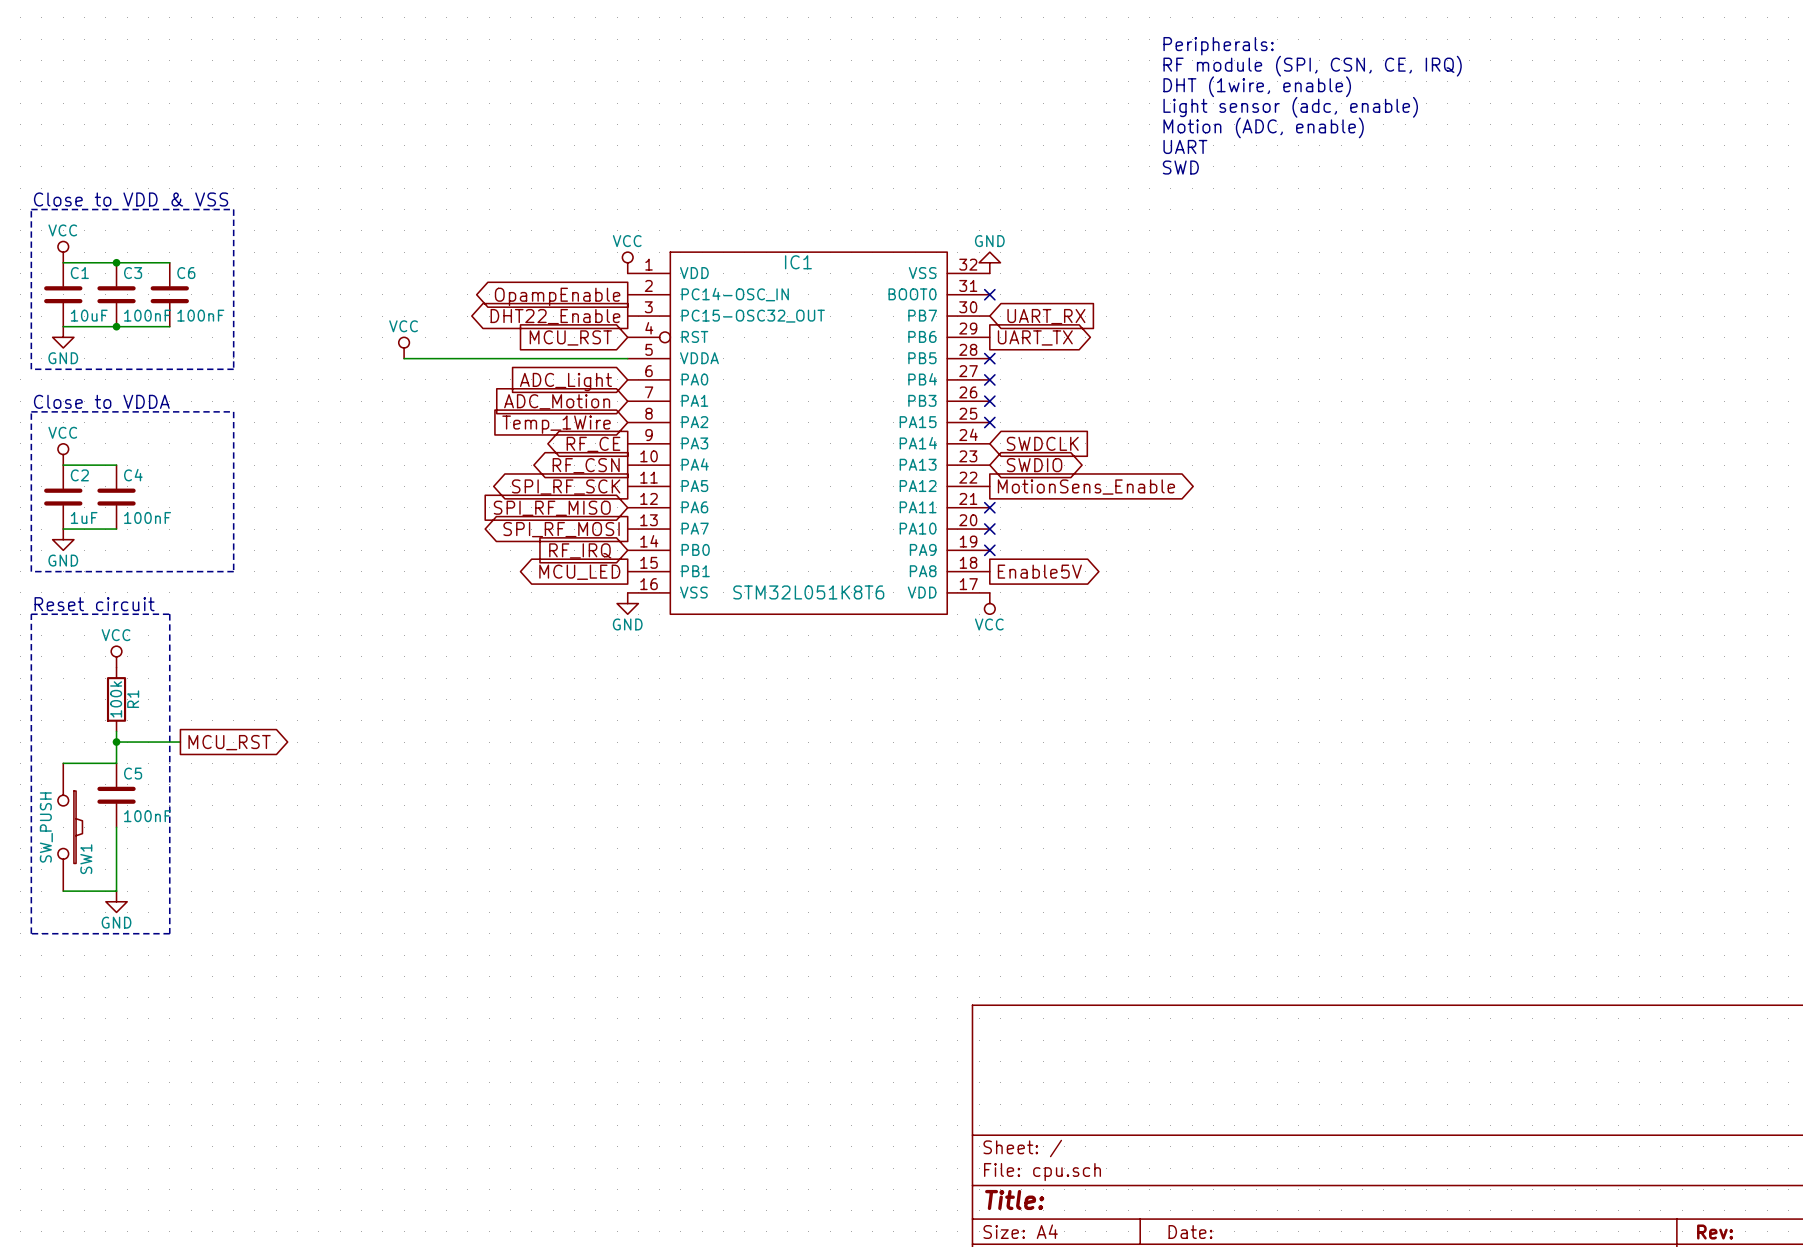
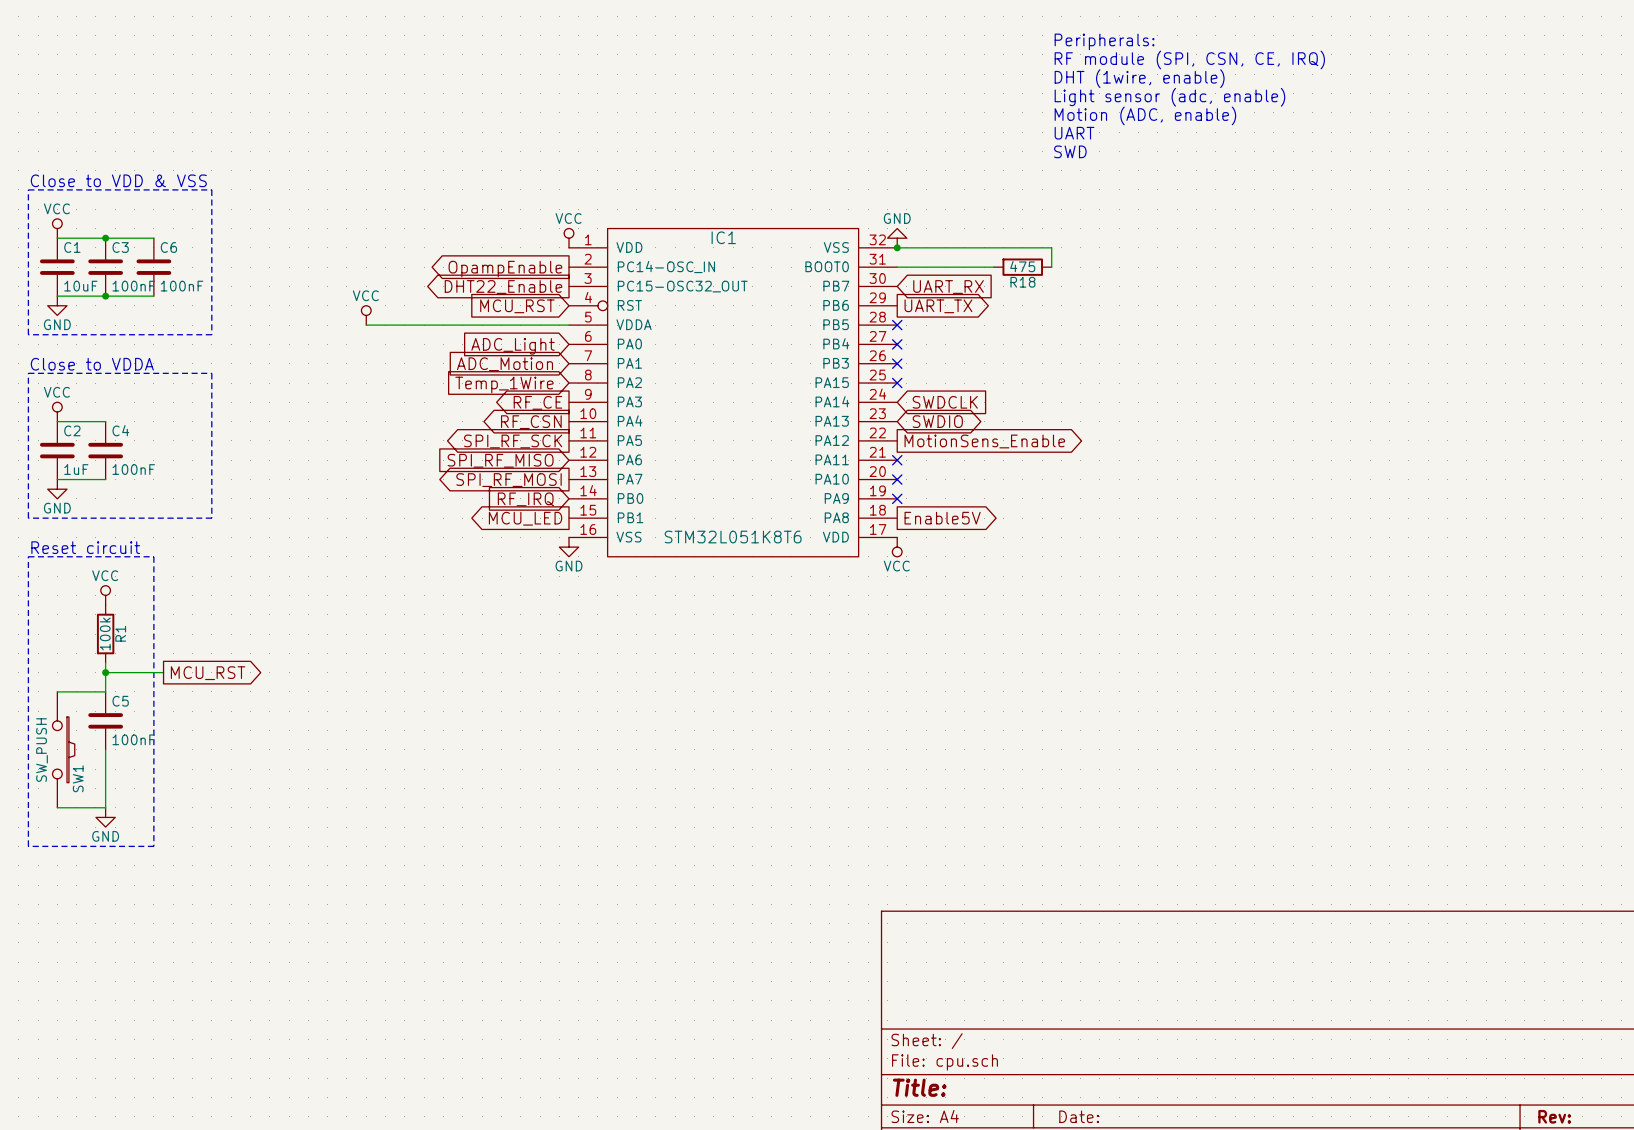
wire: none -> (897, 247) (1051, 247) (1051, 267)
junction: none -> (897, 247)
wire: none -> (897, 267) (993, 267)
no-connect mark: (989, 294) -> none
R18: none -> 475 (1022, 267)

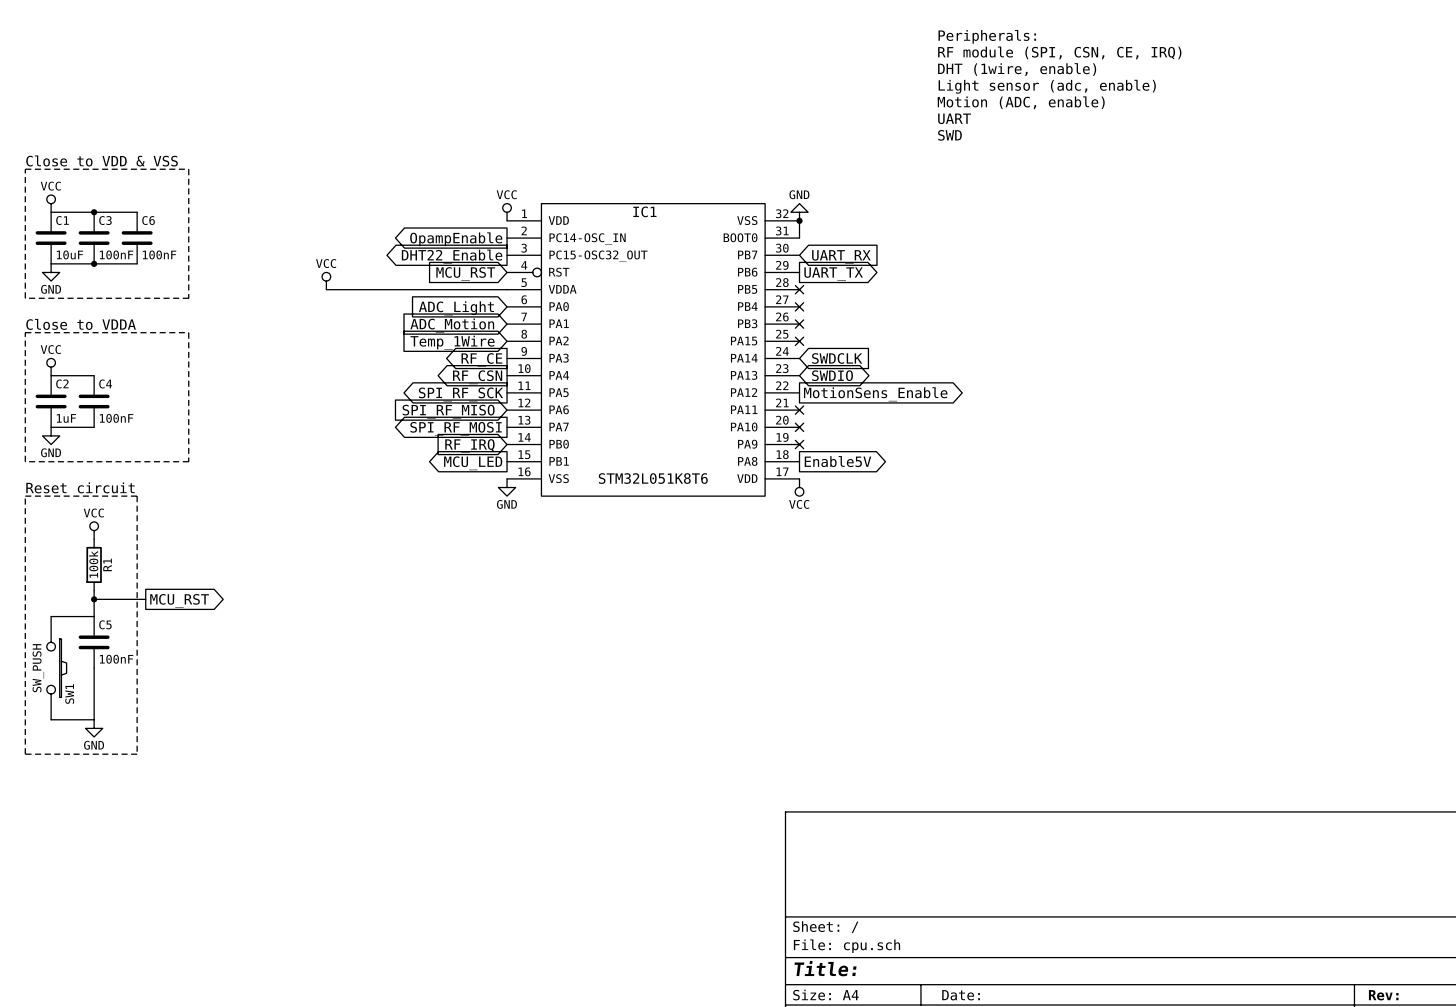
wire: (897, 247) (1051, 247) (1051, 267) -> none
wire: (897, 267) (993, 267) -> (799, 238) (799, 220)
R18: 475 (1022, 267) -> none

